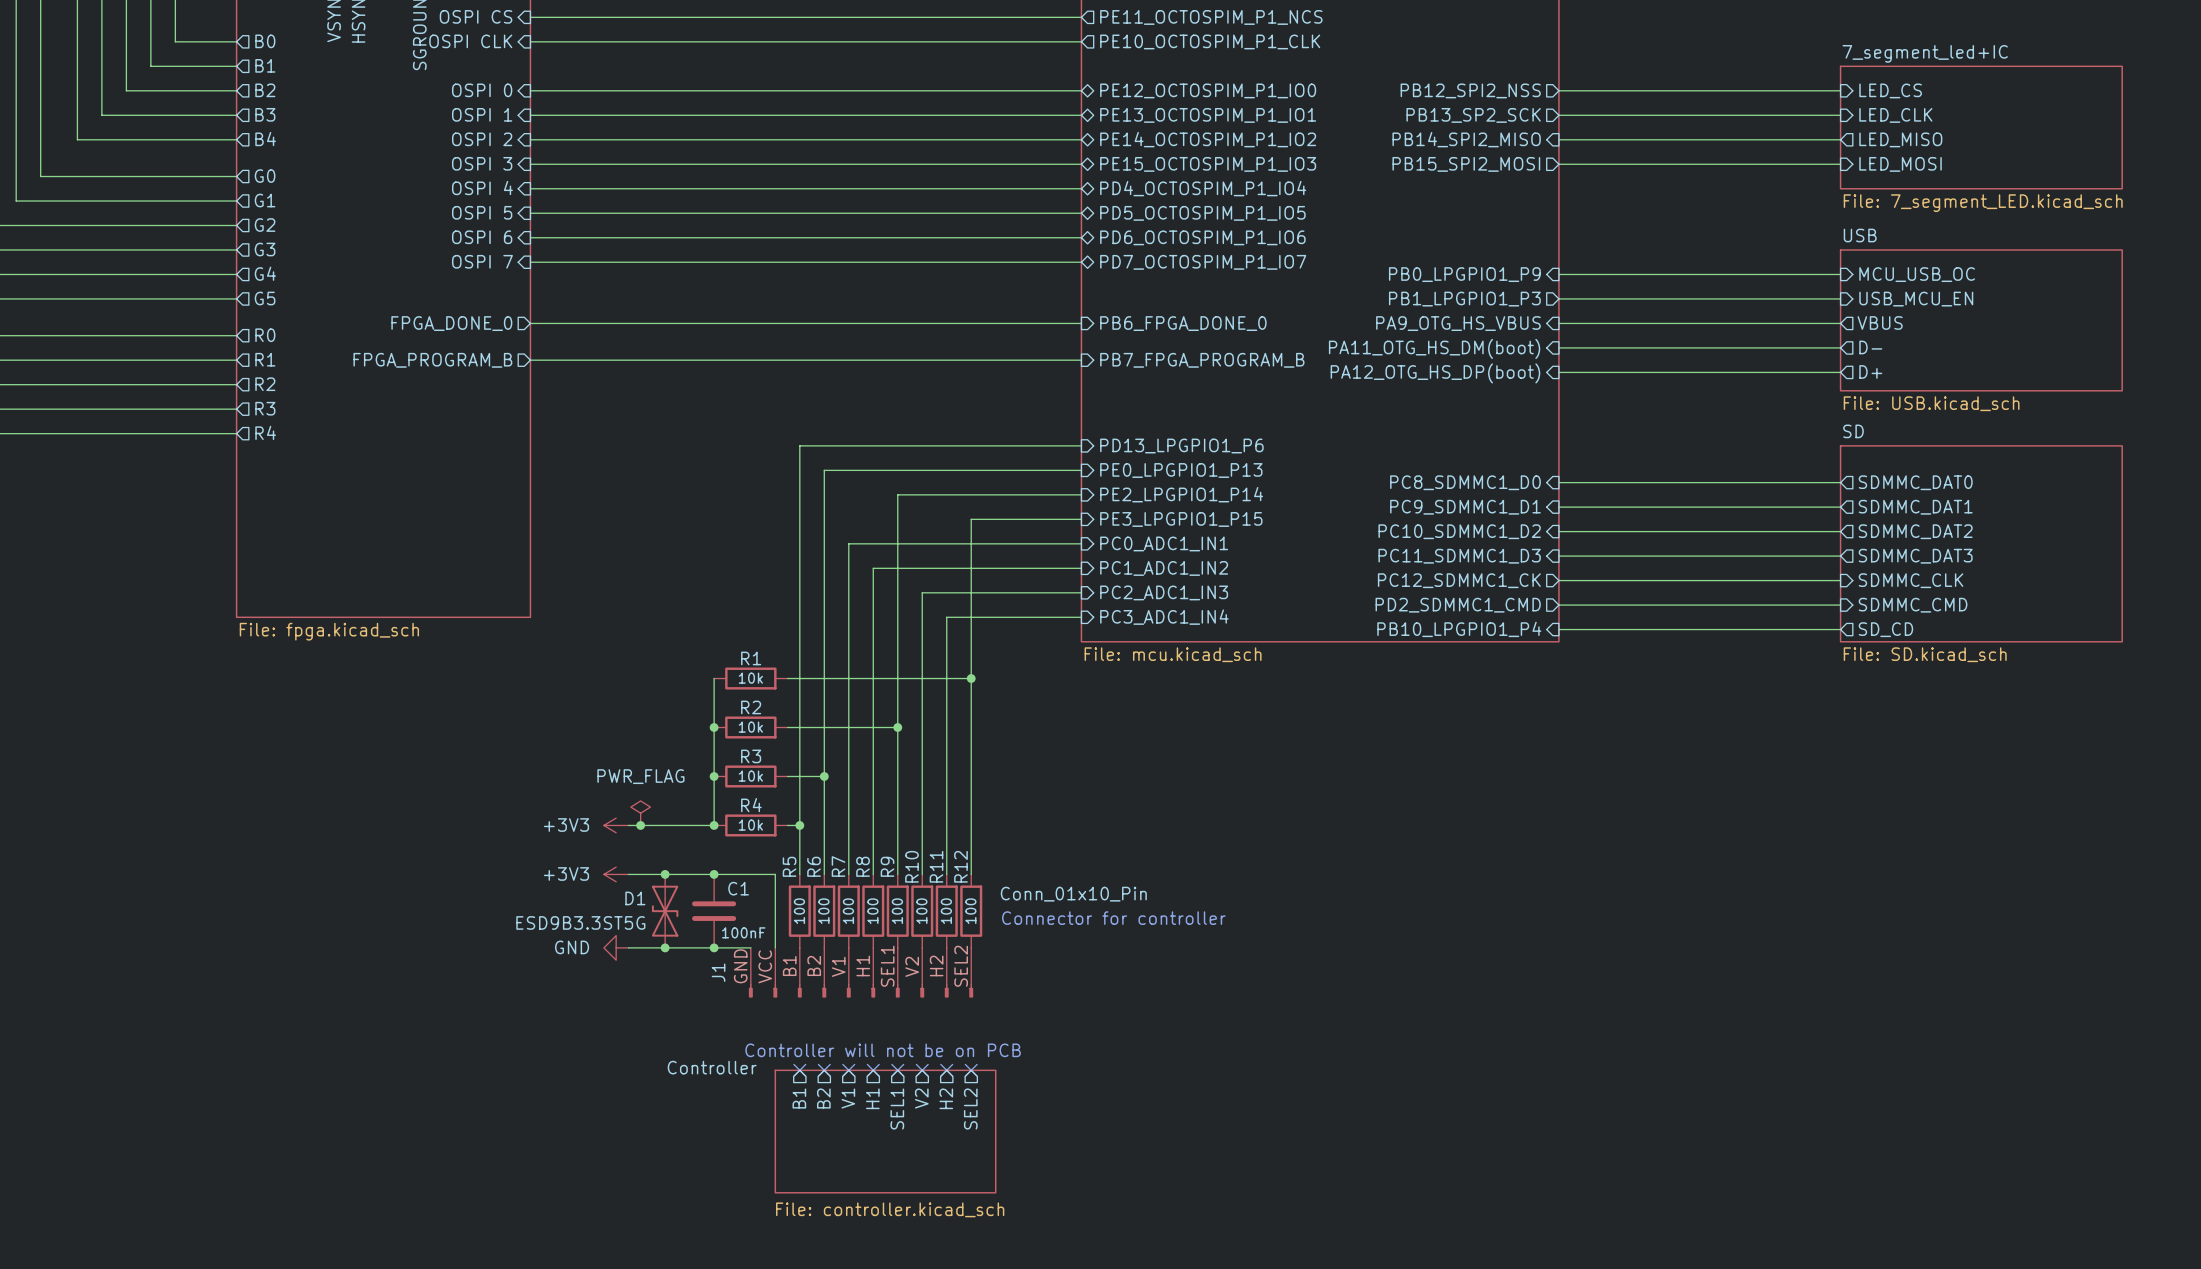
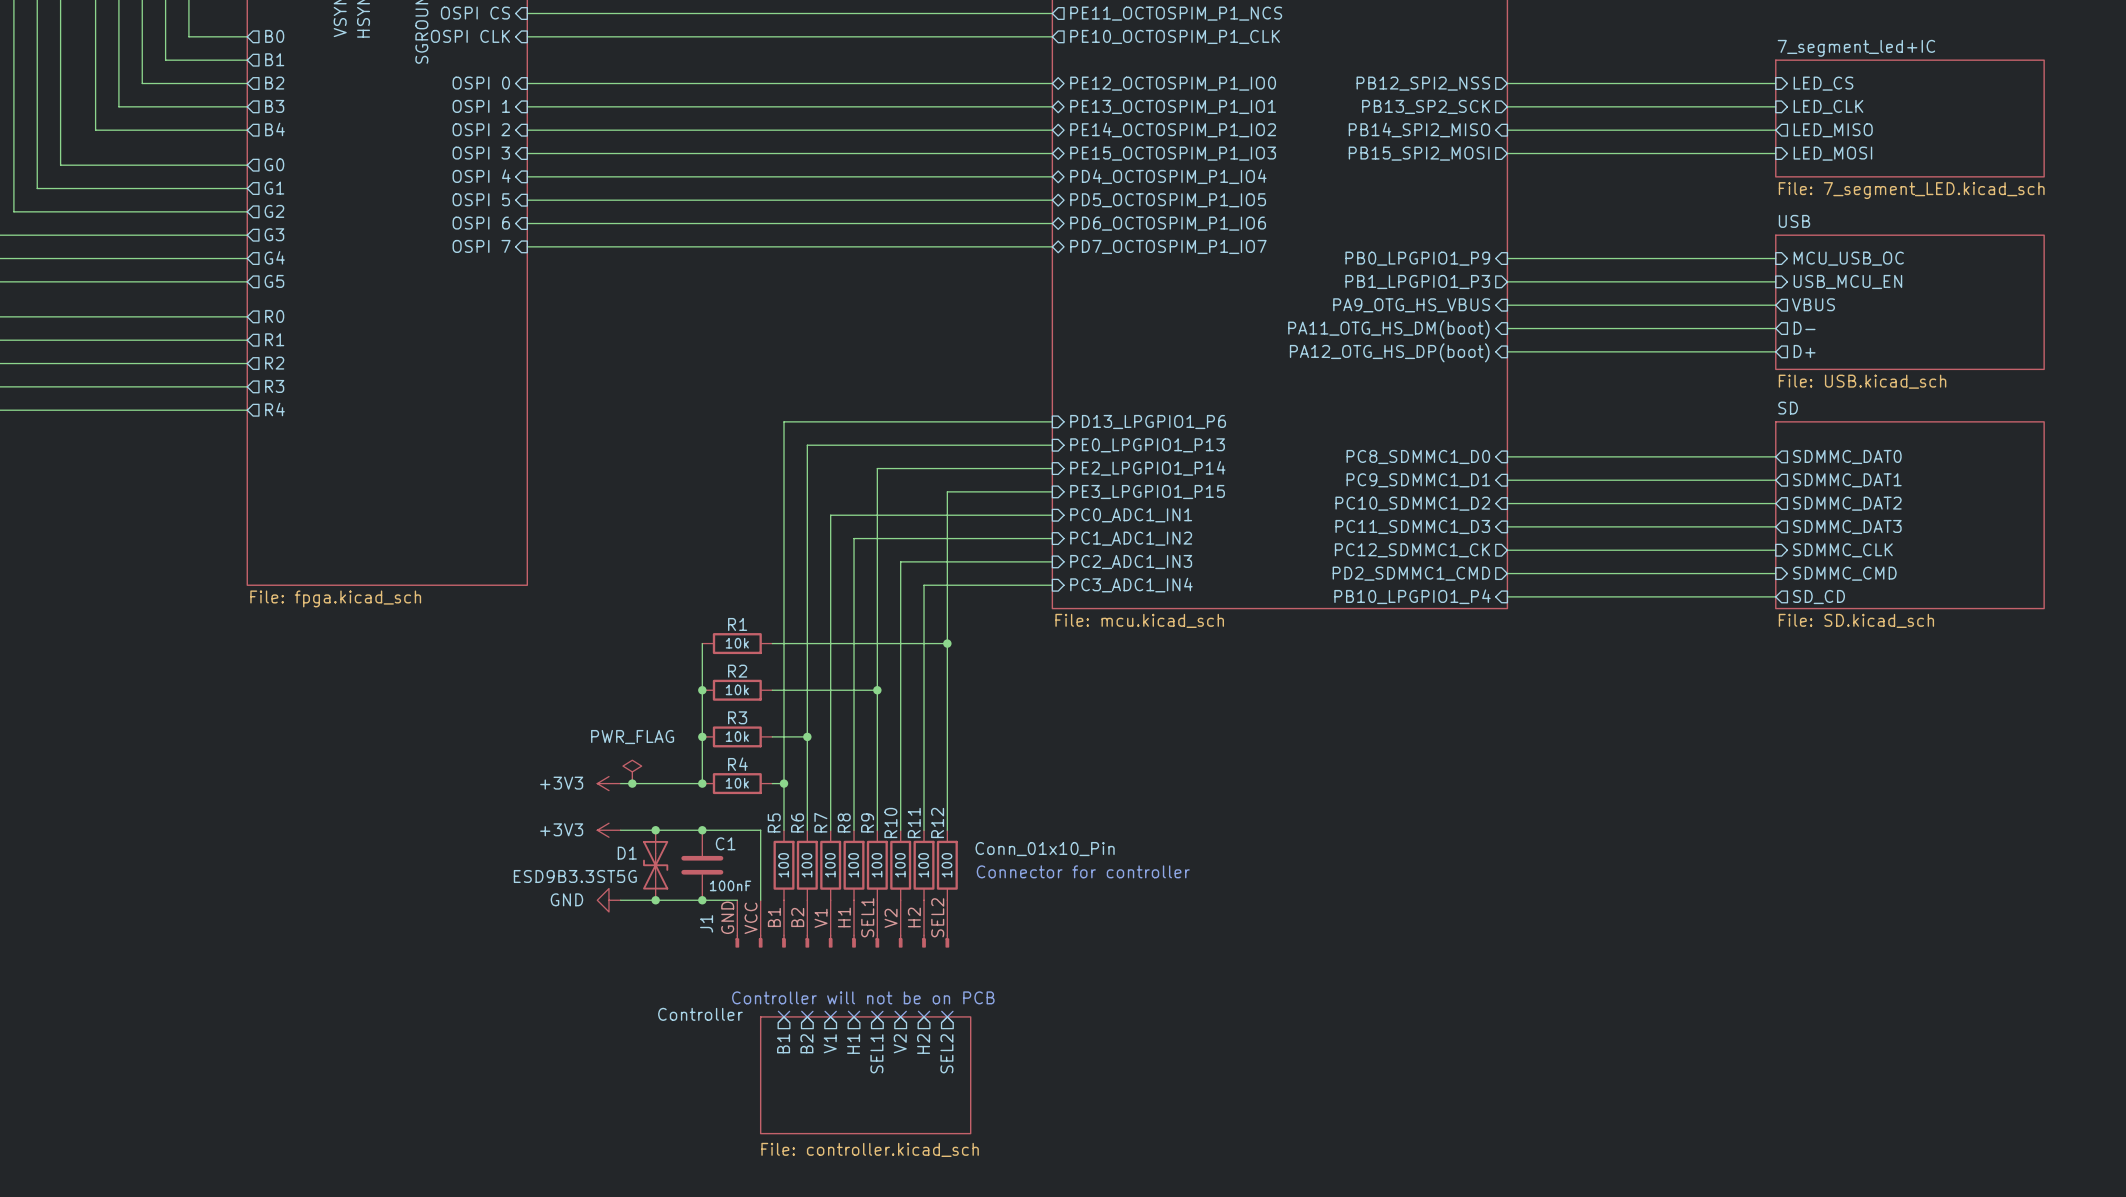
sheet pin: FPGA_DONE_0 (451, 323) -> none
wire: (530, 323) (1081, 323) -> none
sheet pin: PB6_FPGA_DONE_0 (1183, 323) -> none
sheet pin: FPGA_PROGRAM_B (432, 360) -> none
wire: (530, 360) (1081, 360) -> none
sheet pin: PB7_FPGA_PROGRAM_B (1202, 360) -> none

